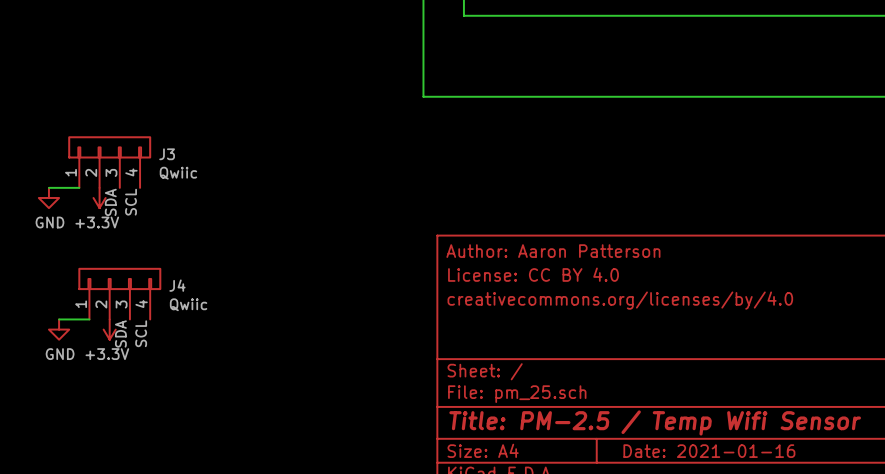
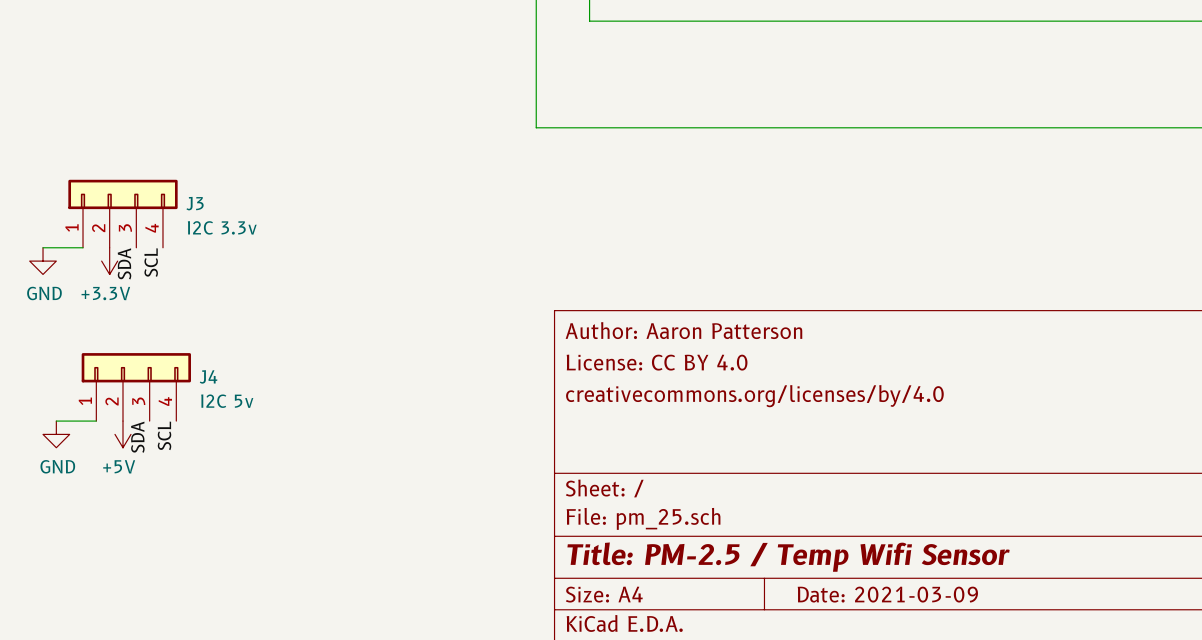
J3 value: Qwiic (178, 173) -> I2C 3.3v (222, 227)
J4 value: Qwiic (188, 304) -> I2C 5v (227, 401)
power symbol: +3.3V (109, 329) -> +5V (123, 434)
title block: Date: 2021-01-16 (709, 451) -> Date: 2021-03-09 (887, 594)

